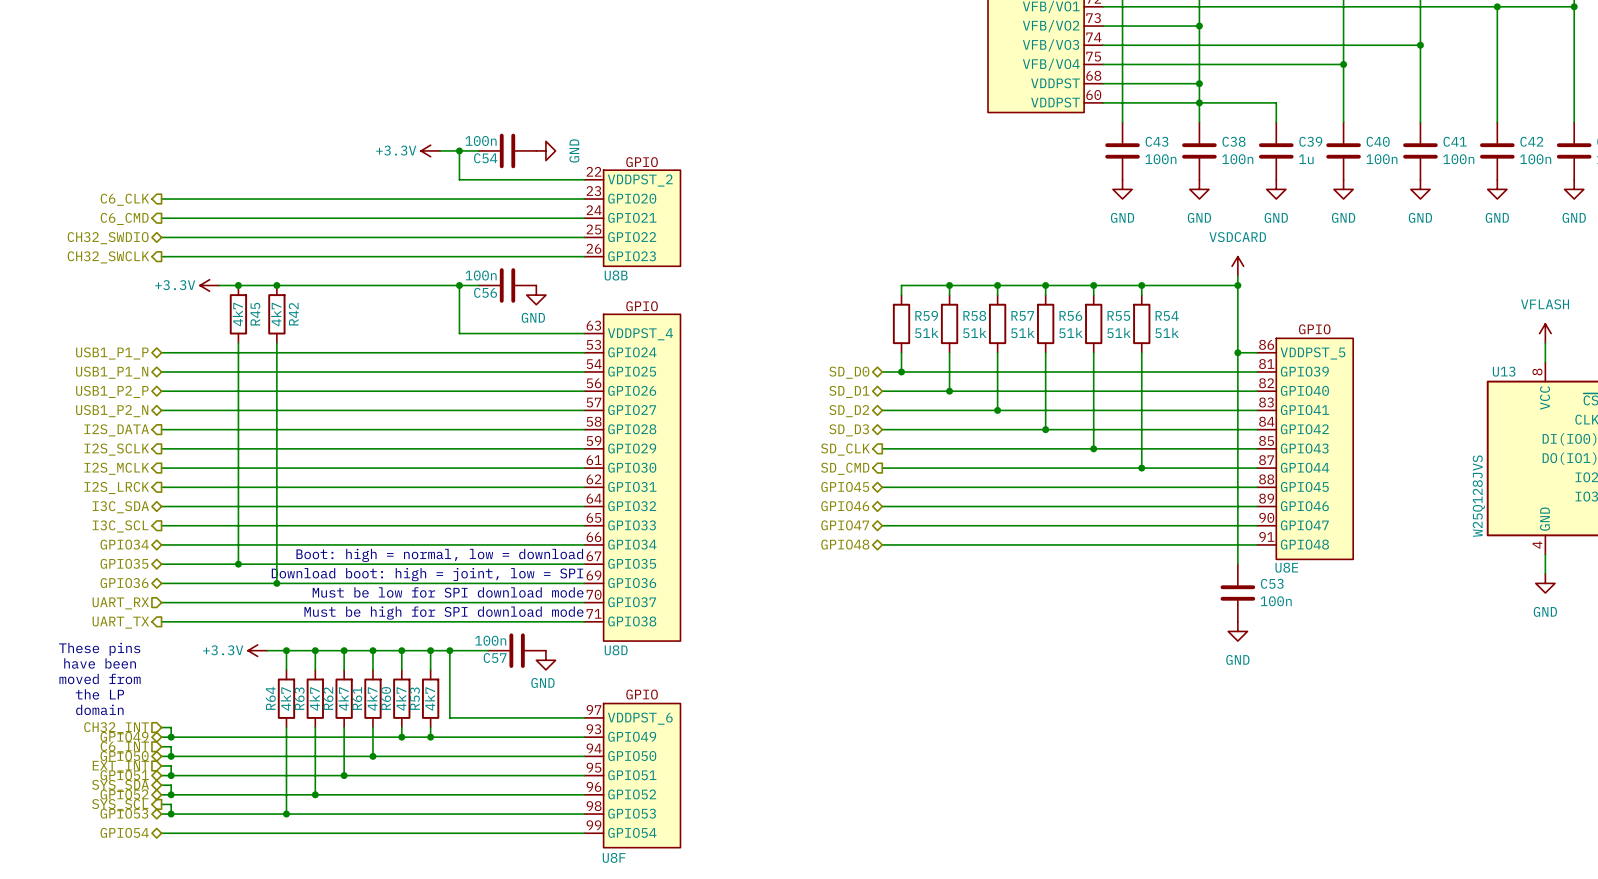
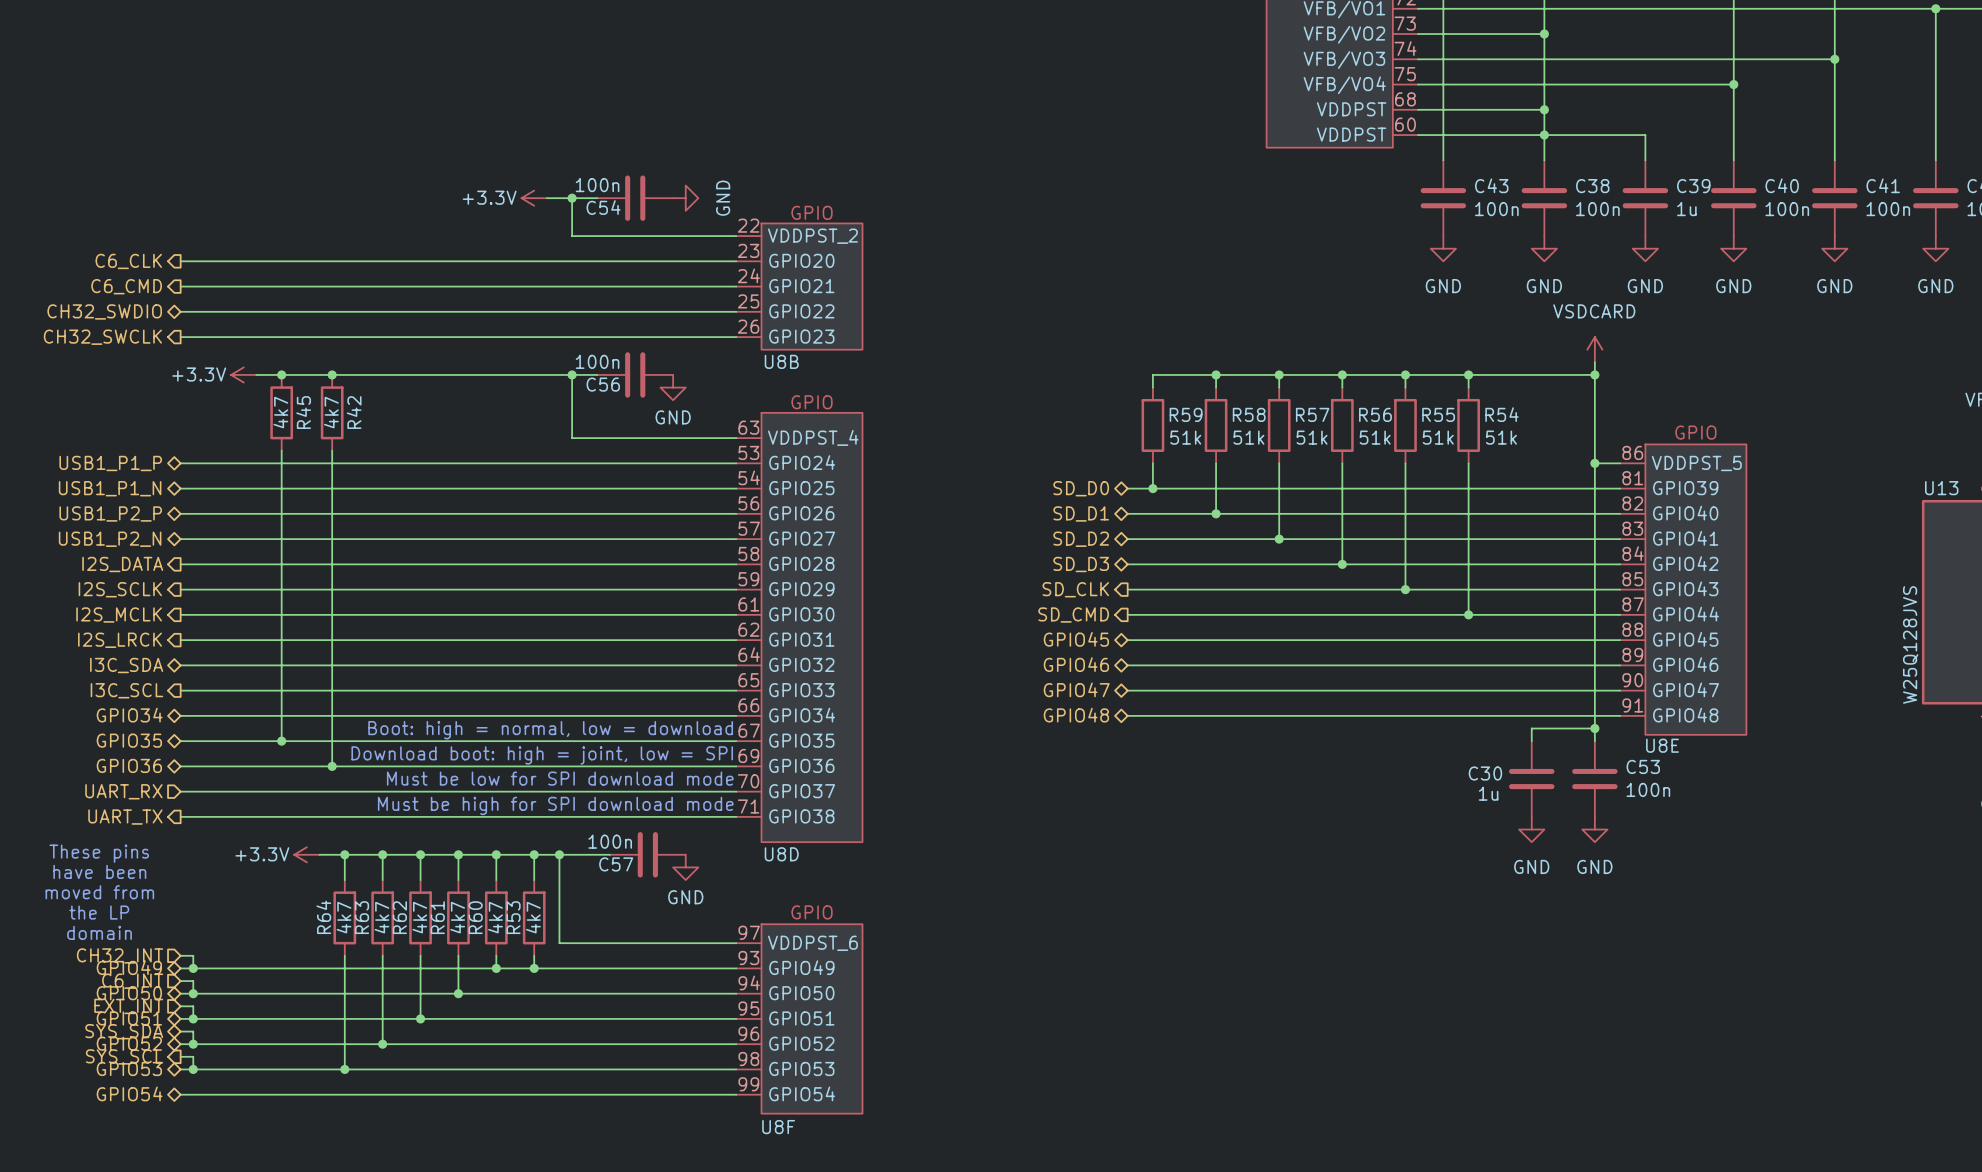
wire: none -> (1594, 728) (1531, 728) (1531, 741)
junction: none -> (1594, 728)
C30: none -> 1u (1531, 779)
power symbol: none -> GND (1531, 829)

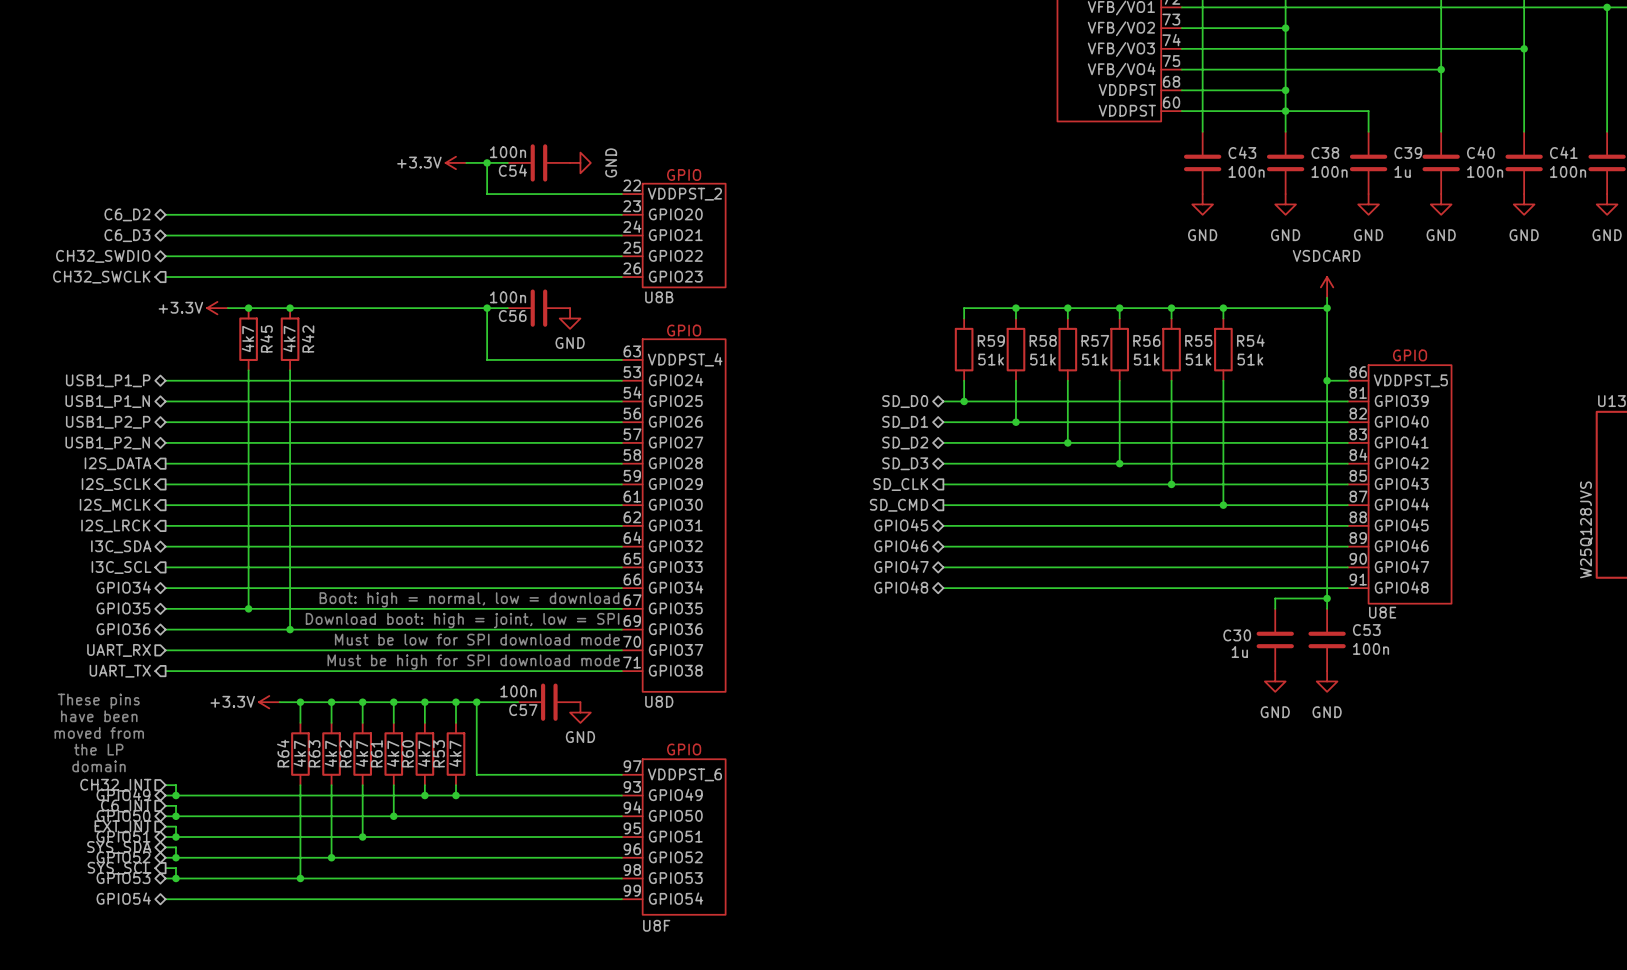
hierarchical label shape: output (128, 261) -> bidirectional (127, 214)
hierarchical label: C6_CLK (128, 261) -> C6_D2 (127, 214)
hierarchical label shape: output (126, 286) -> bidirectional (127, 235)
hierarchical label: C6_CMD (126, 286) -> C6_D3 (127, 235)

